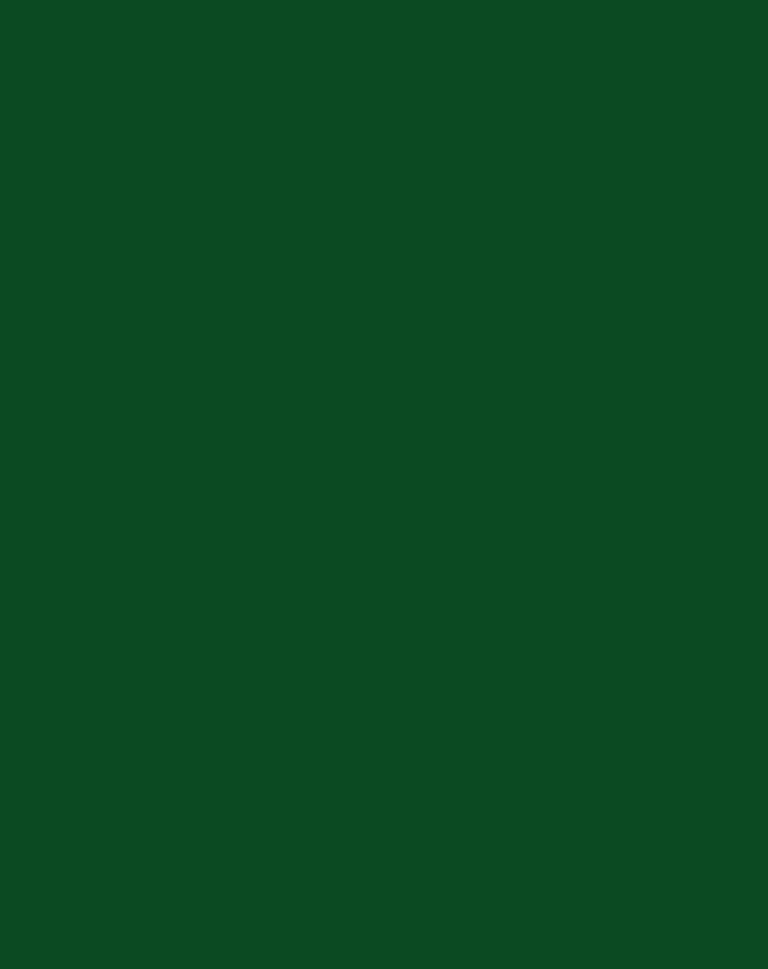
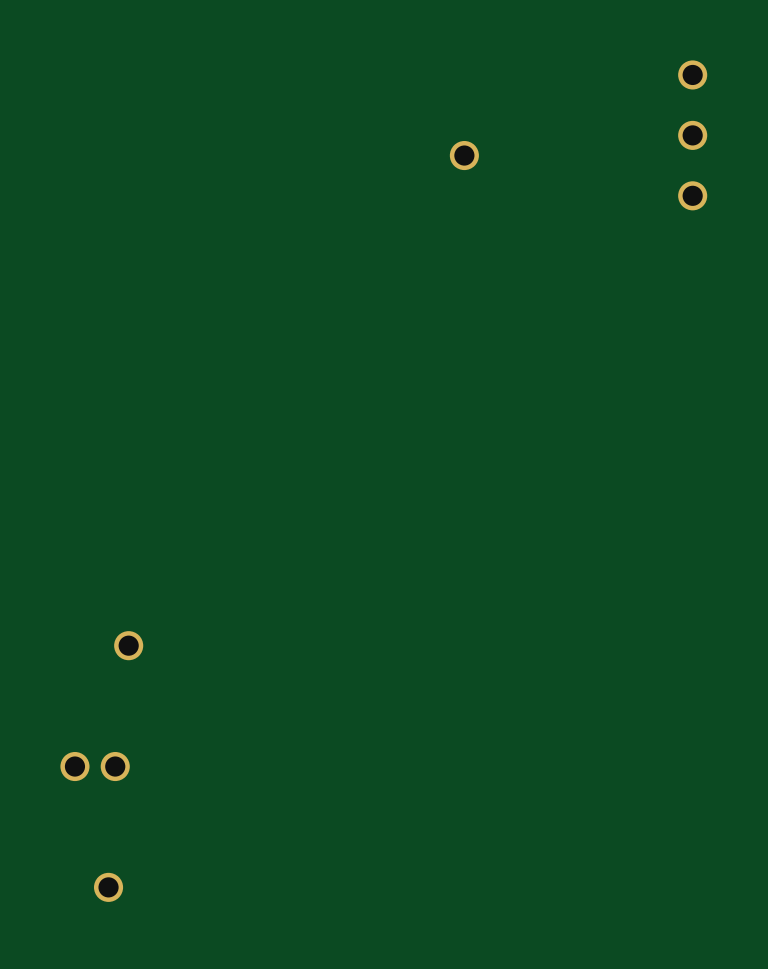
part: none -> (692, 74)
part: none -> (692, 135)
part: none -> (464, 155)
part: none -> (692, 195)
part: none -> (128, 645)
part: none -> (74, 766)
part: none -> (115, 766)
part: none -> (108, 887)

